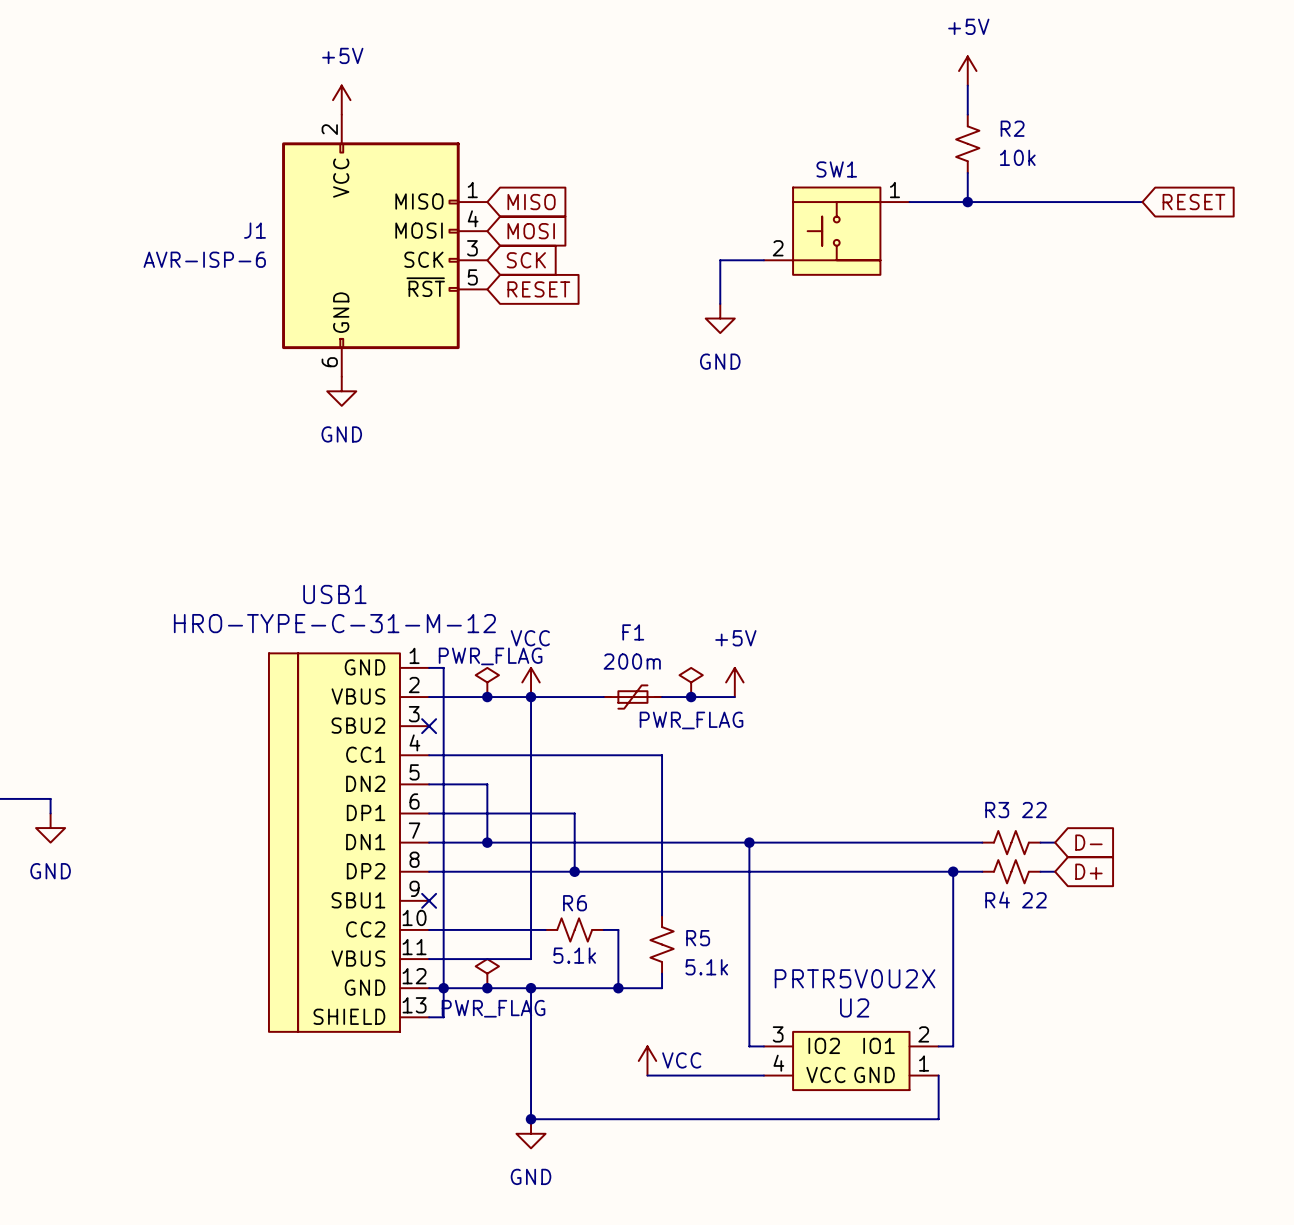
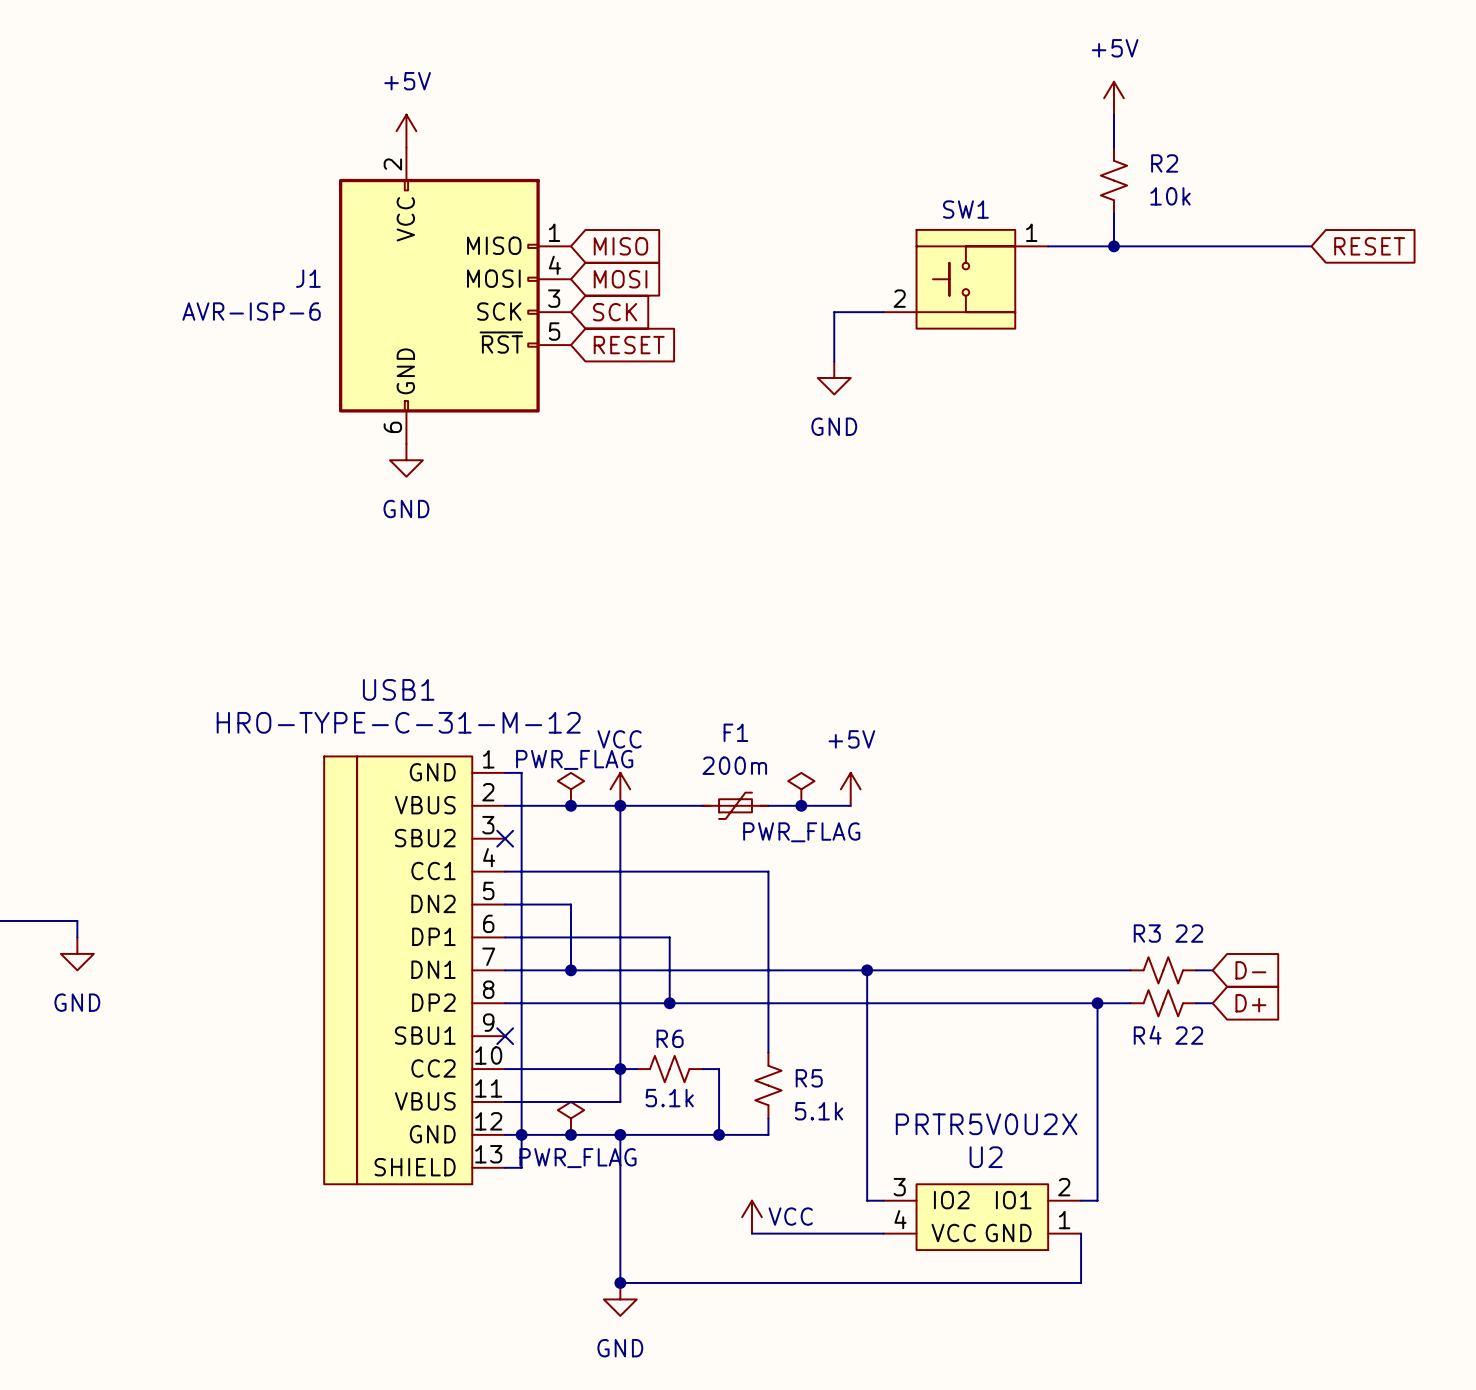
junction: none -> (620, 1069)

